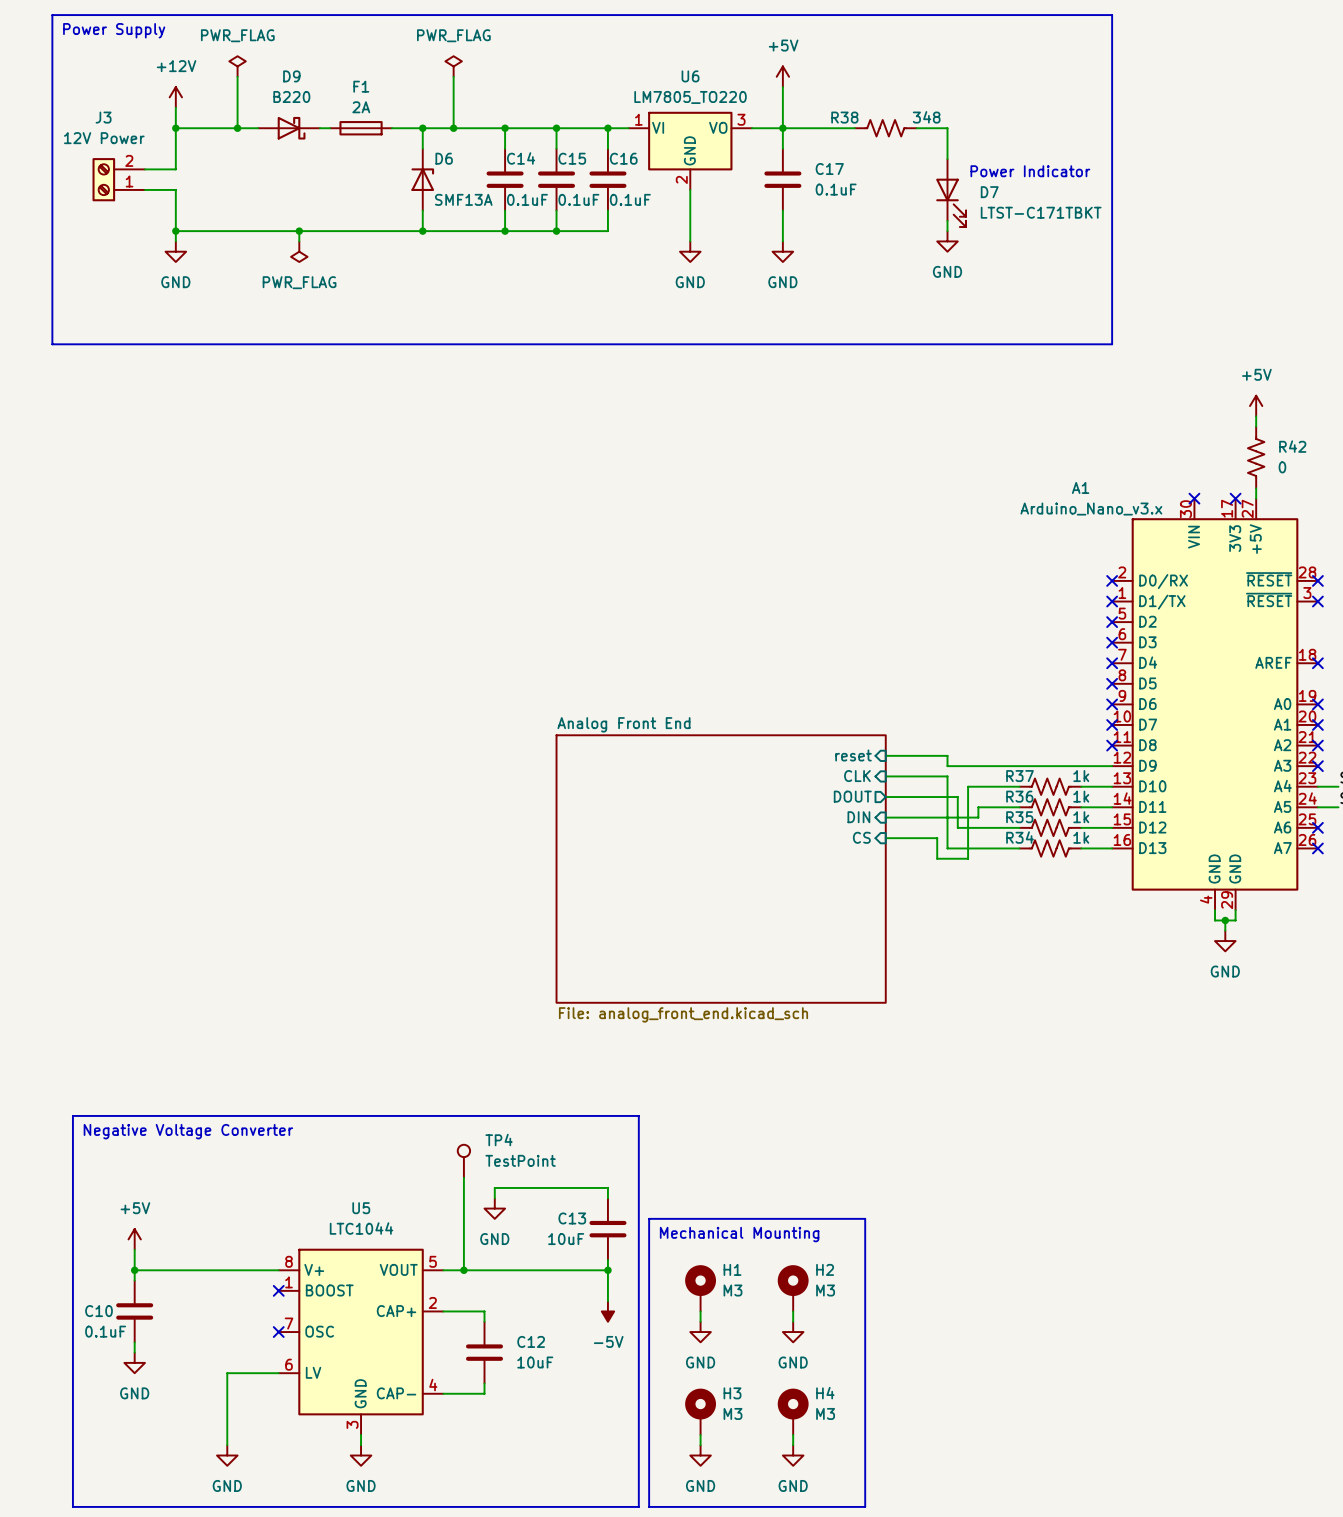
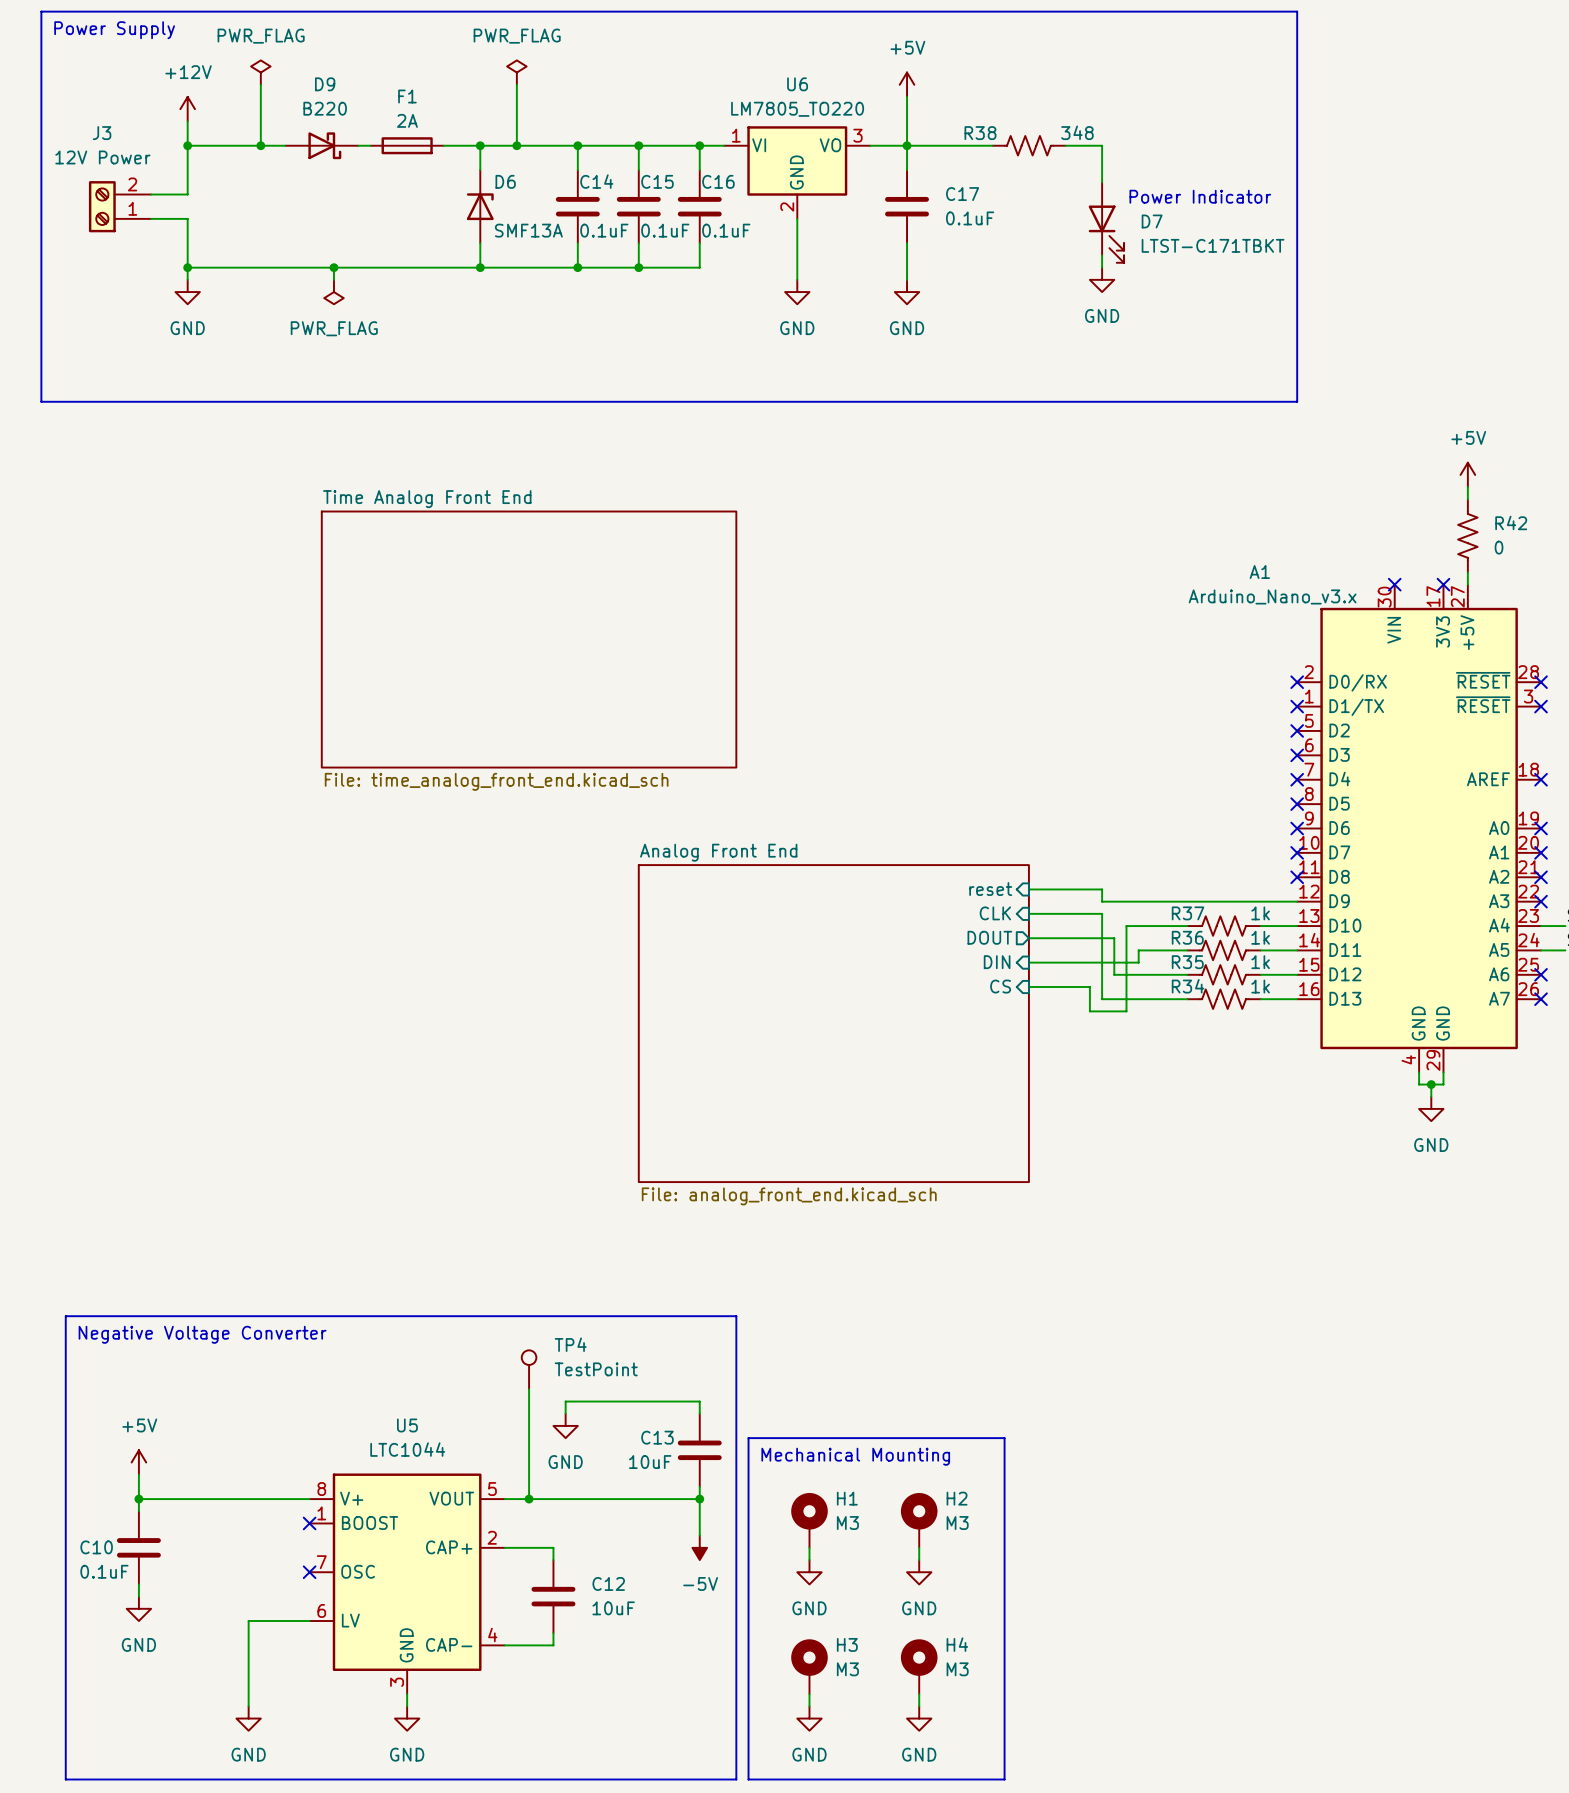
sheet Time Analog Front End: none -> File: time_analog_front_end.kicad_sch (529, 639)

